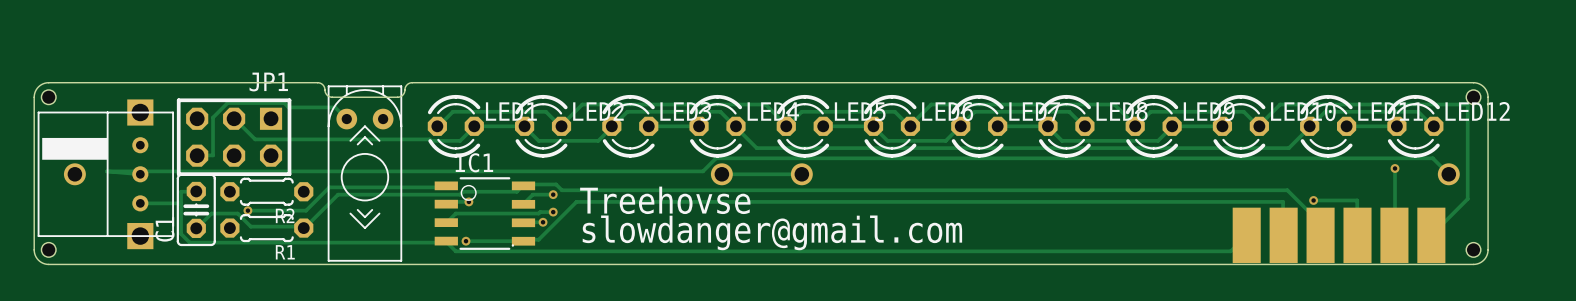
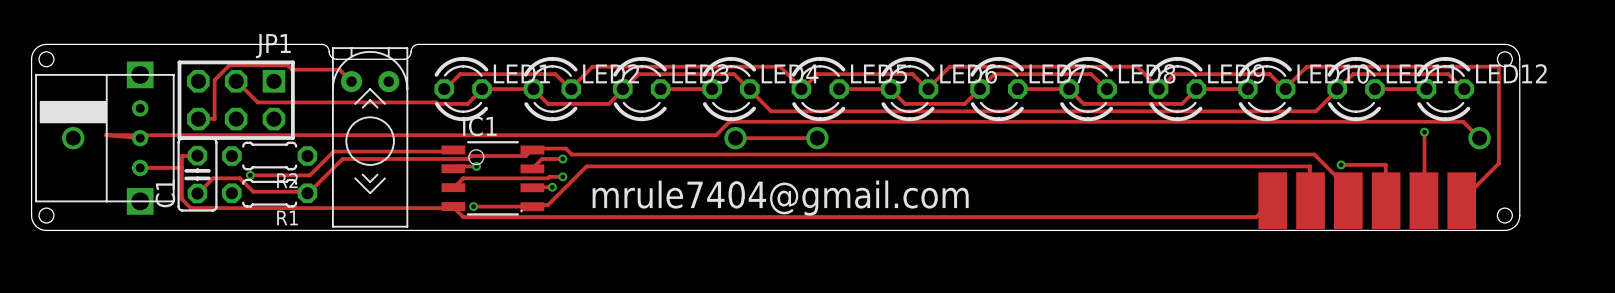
text: Treehovse (665, 200) -> none
text: slowdanger@gmail.com (772, 232) -> mrule7404@gmail.com (780, 198)

